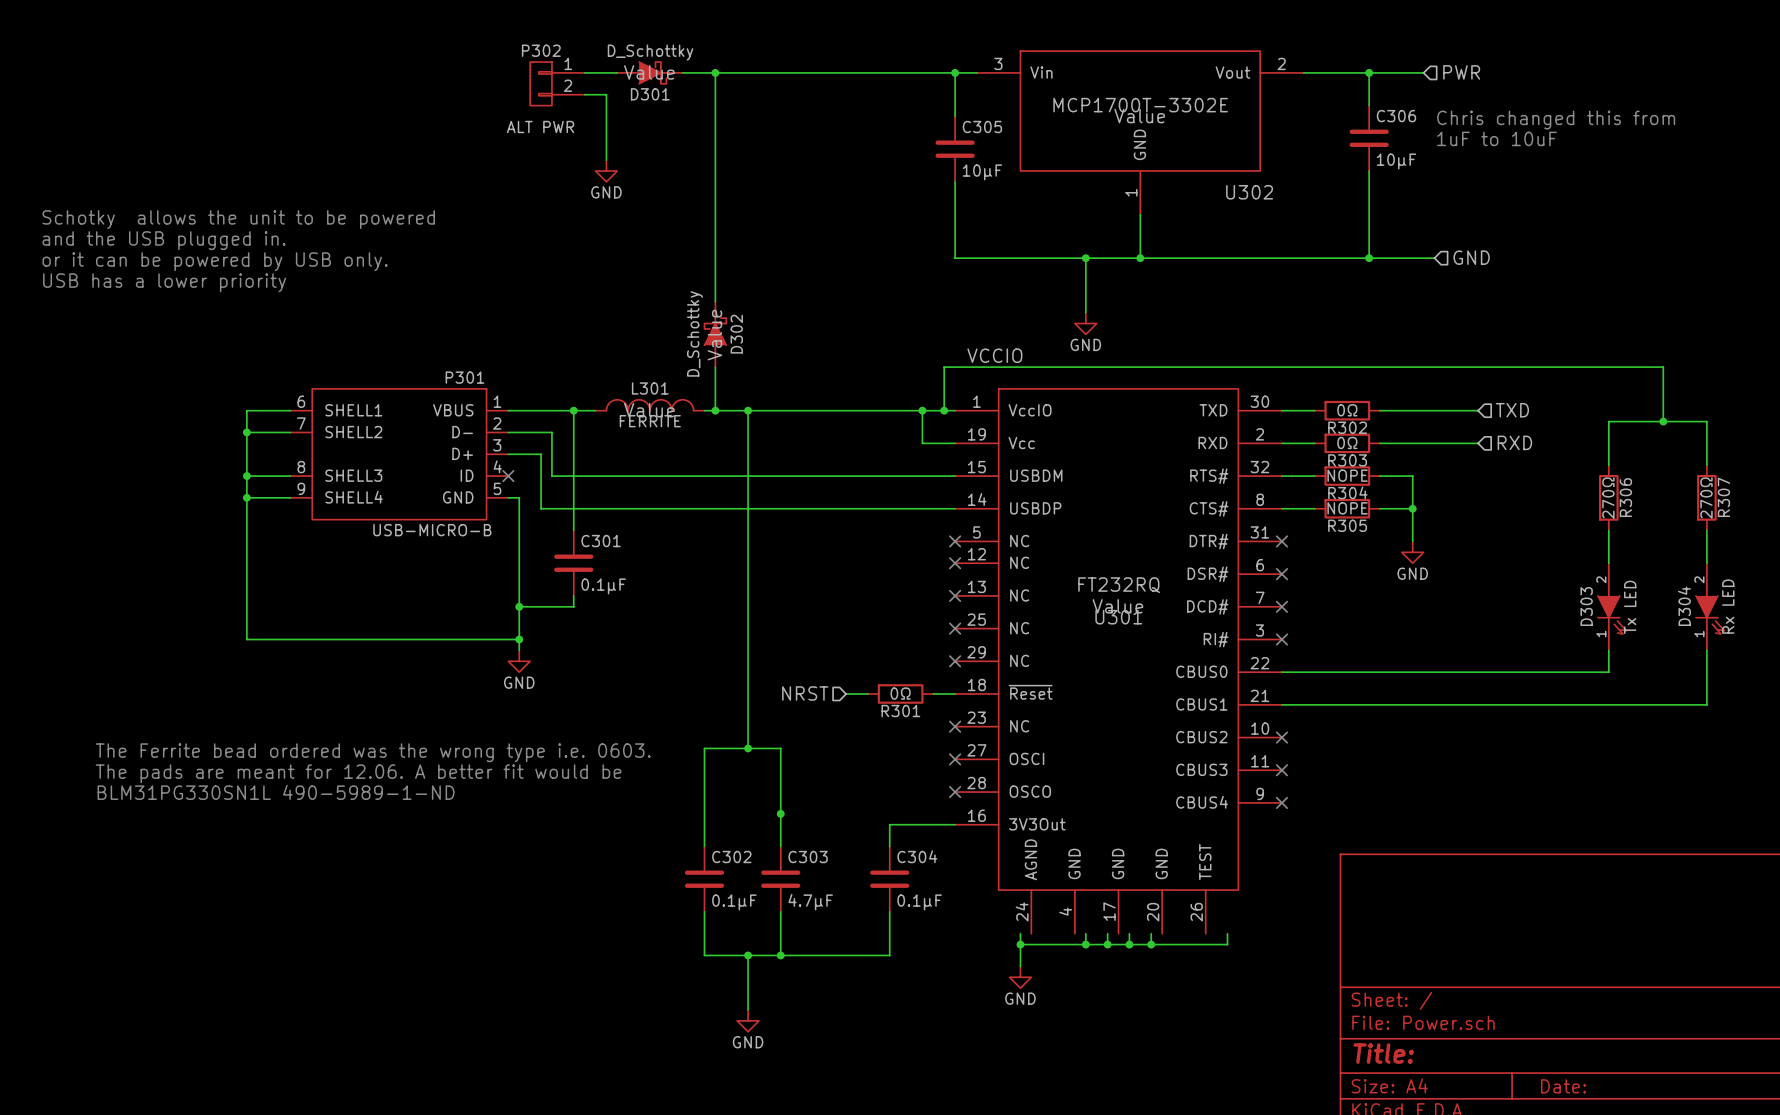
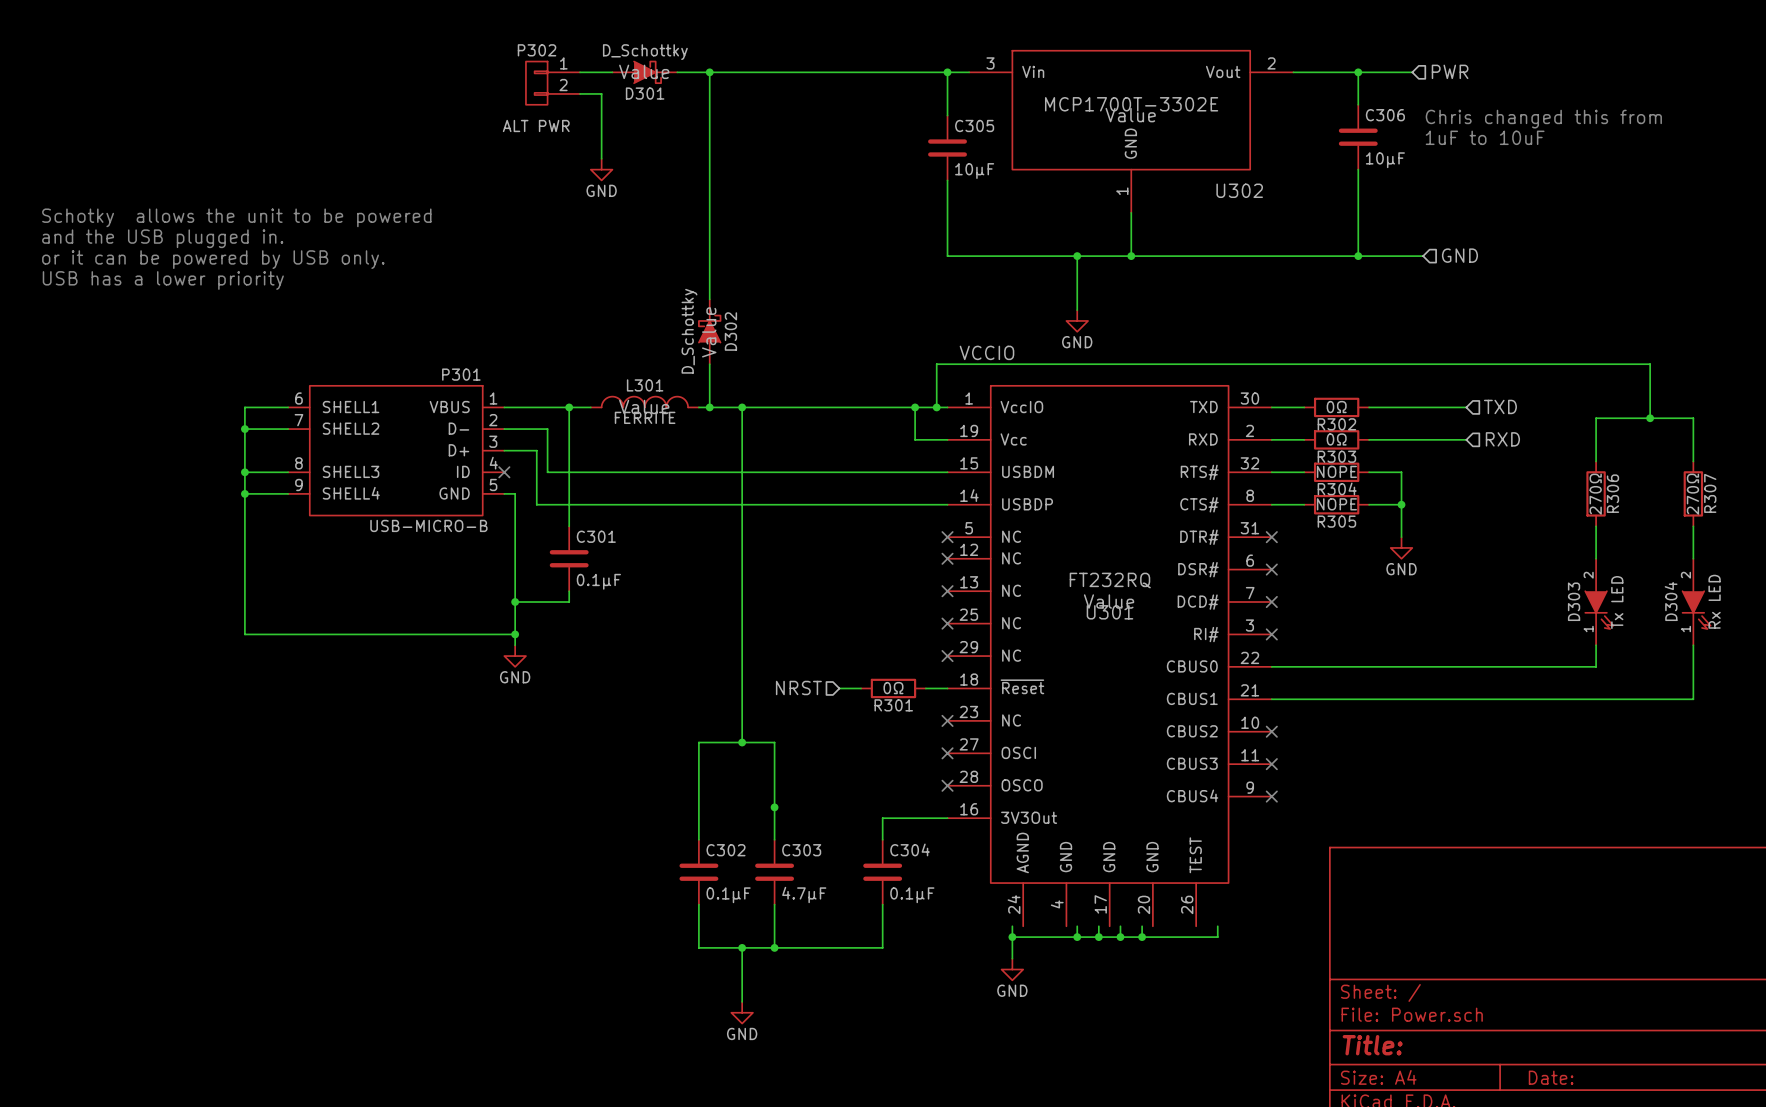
text: The Ferrite bead ordered was the wrong type i.e. 0603. (373, 752) -> none
text: The pads are meant for 12.06. A better fit would be (358, 773) -> none
text: BLM31PG330SN1L 490-5989-1-ND (276, 792) -> none

